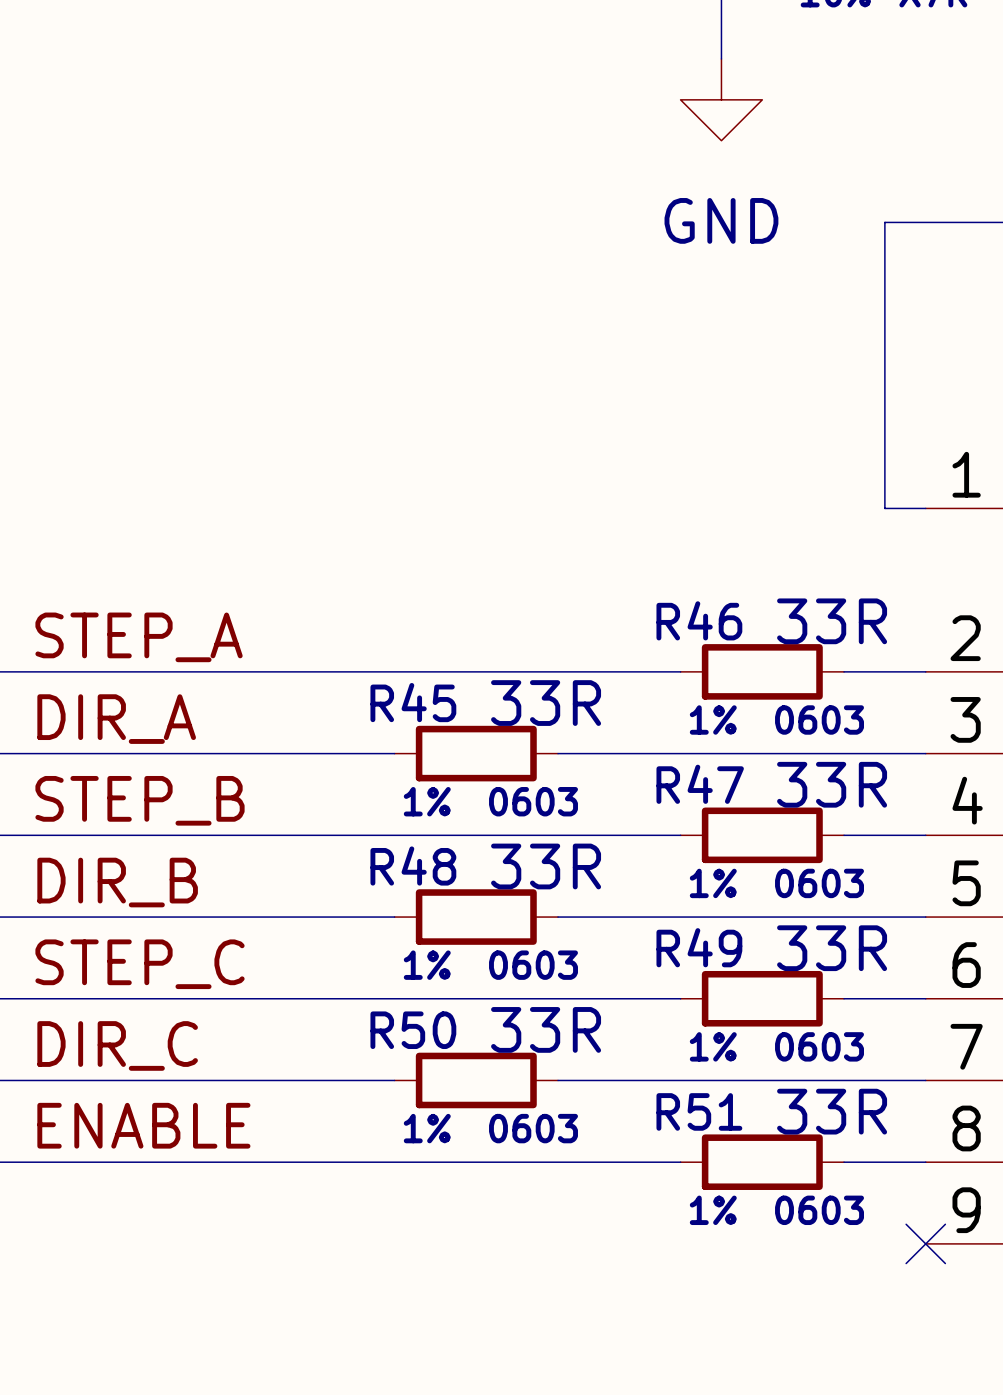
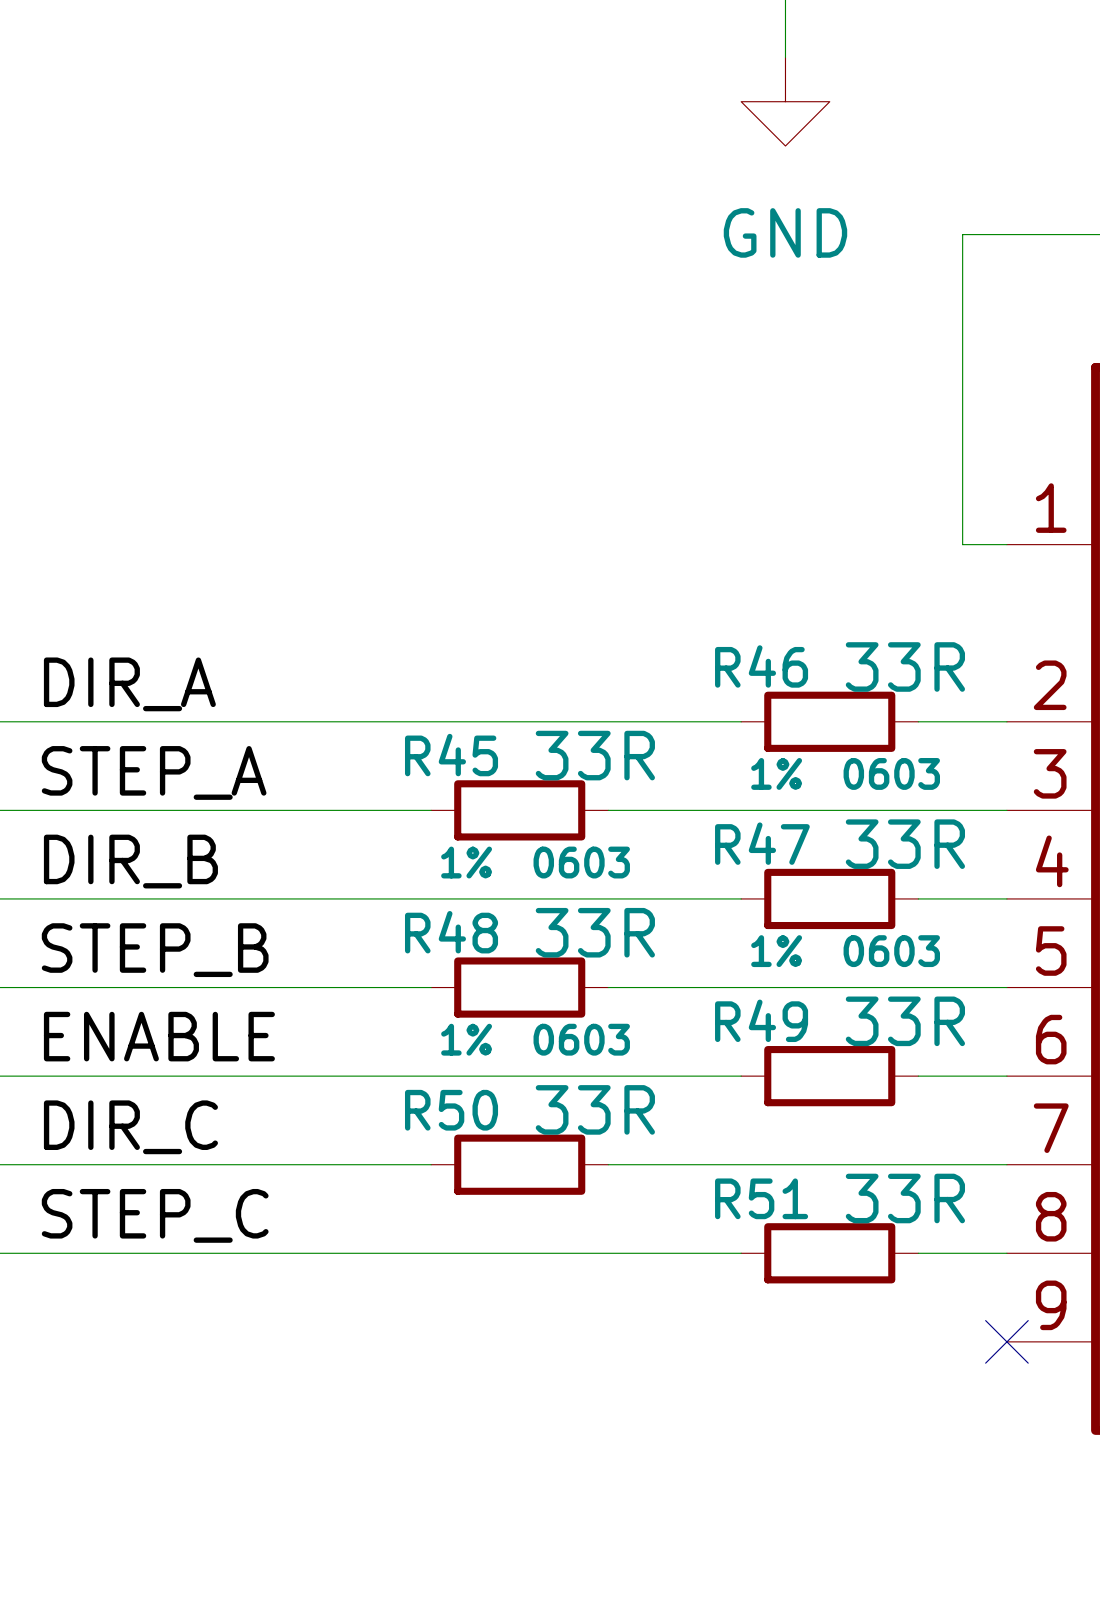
label: STEP_A (139, 637) -> DIR_A (129, 684)
label: DIR_A (116, 719) -> STEP_A (154, 772)
label: STEP_B (140, 800) -> DIR_B (130, 861)
label: DIR_B (117, 882) -> STEP_B (155, 950)
label: STEP_C (140, 964) -> ENABLE (159, 1036)
R49 text: 1% (713, 1046) -> none
R49 text: 0603 (819, 1046) -> none
label: ENABLE (143, 1125) -> STEP_C (155, 1215)
R50 text: 1% (427, 1128) -> none
R50 text: 0603 (533, 1128) -> none
R51 text: 1% (713, 1210) -> none
R51 text: 0603 (819, 1210) -> none

